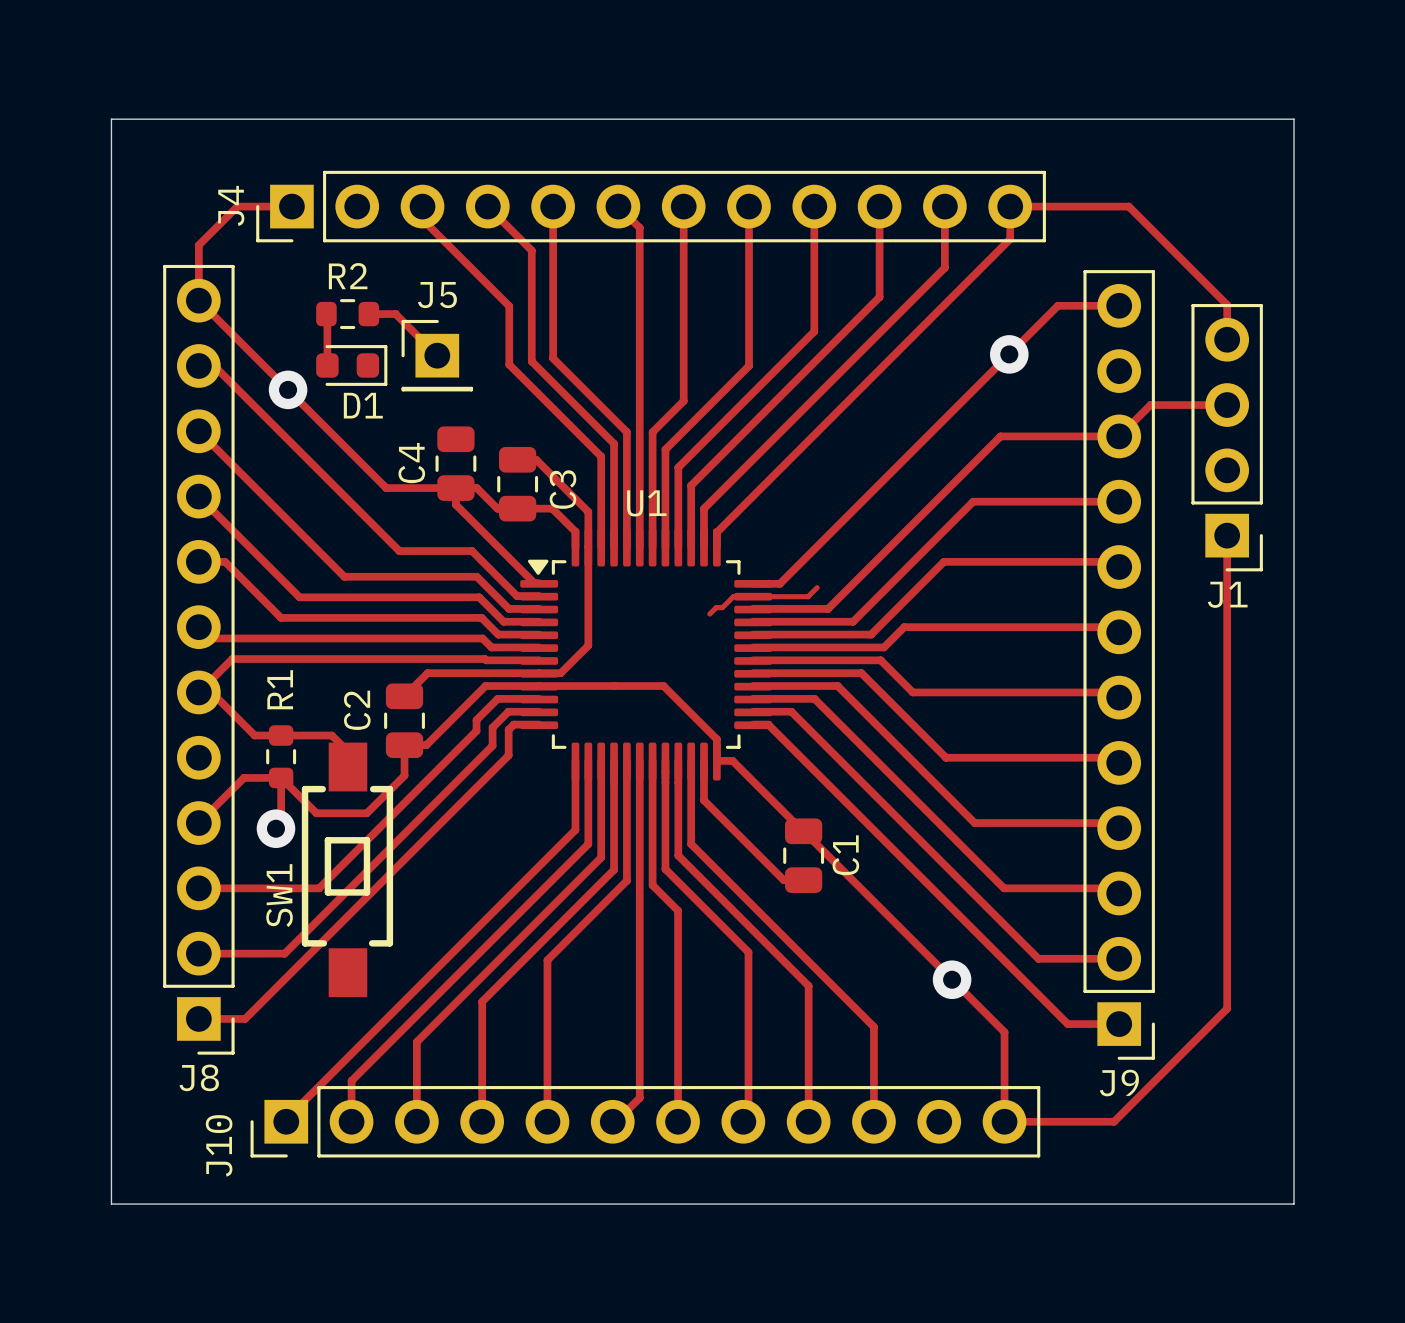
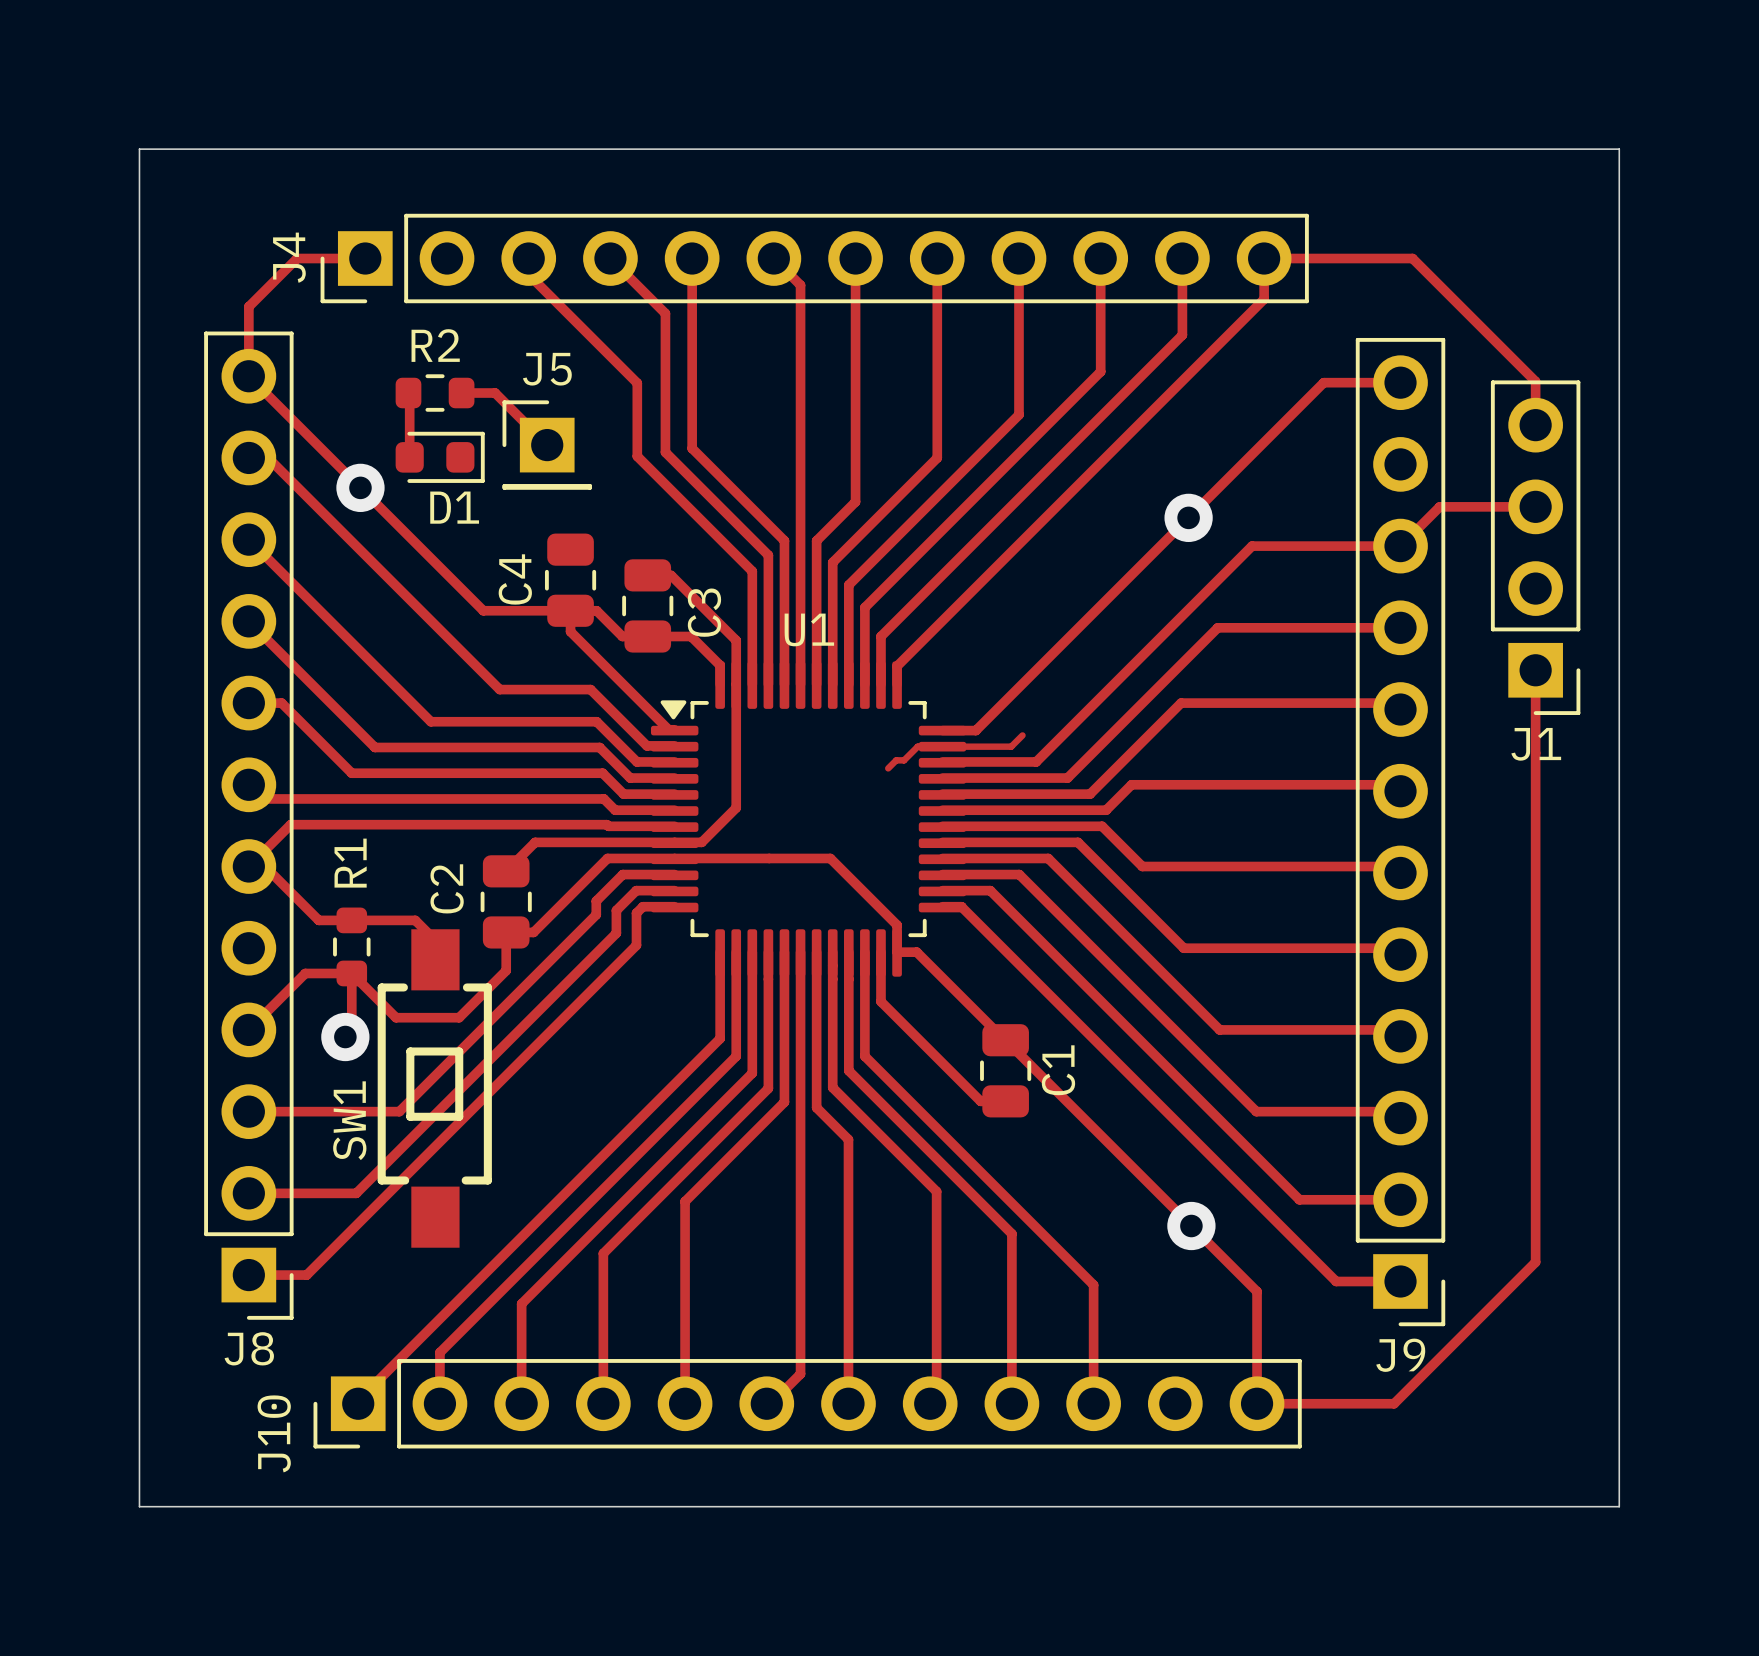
via position: (1009, 354) -> (1188, 517)

